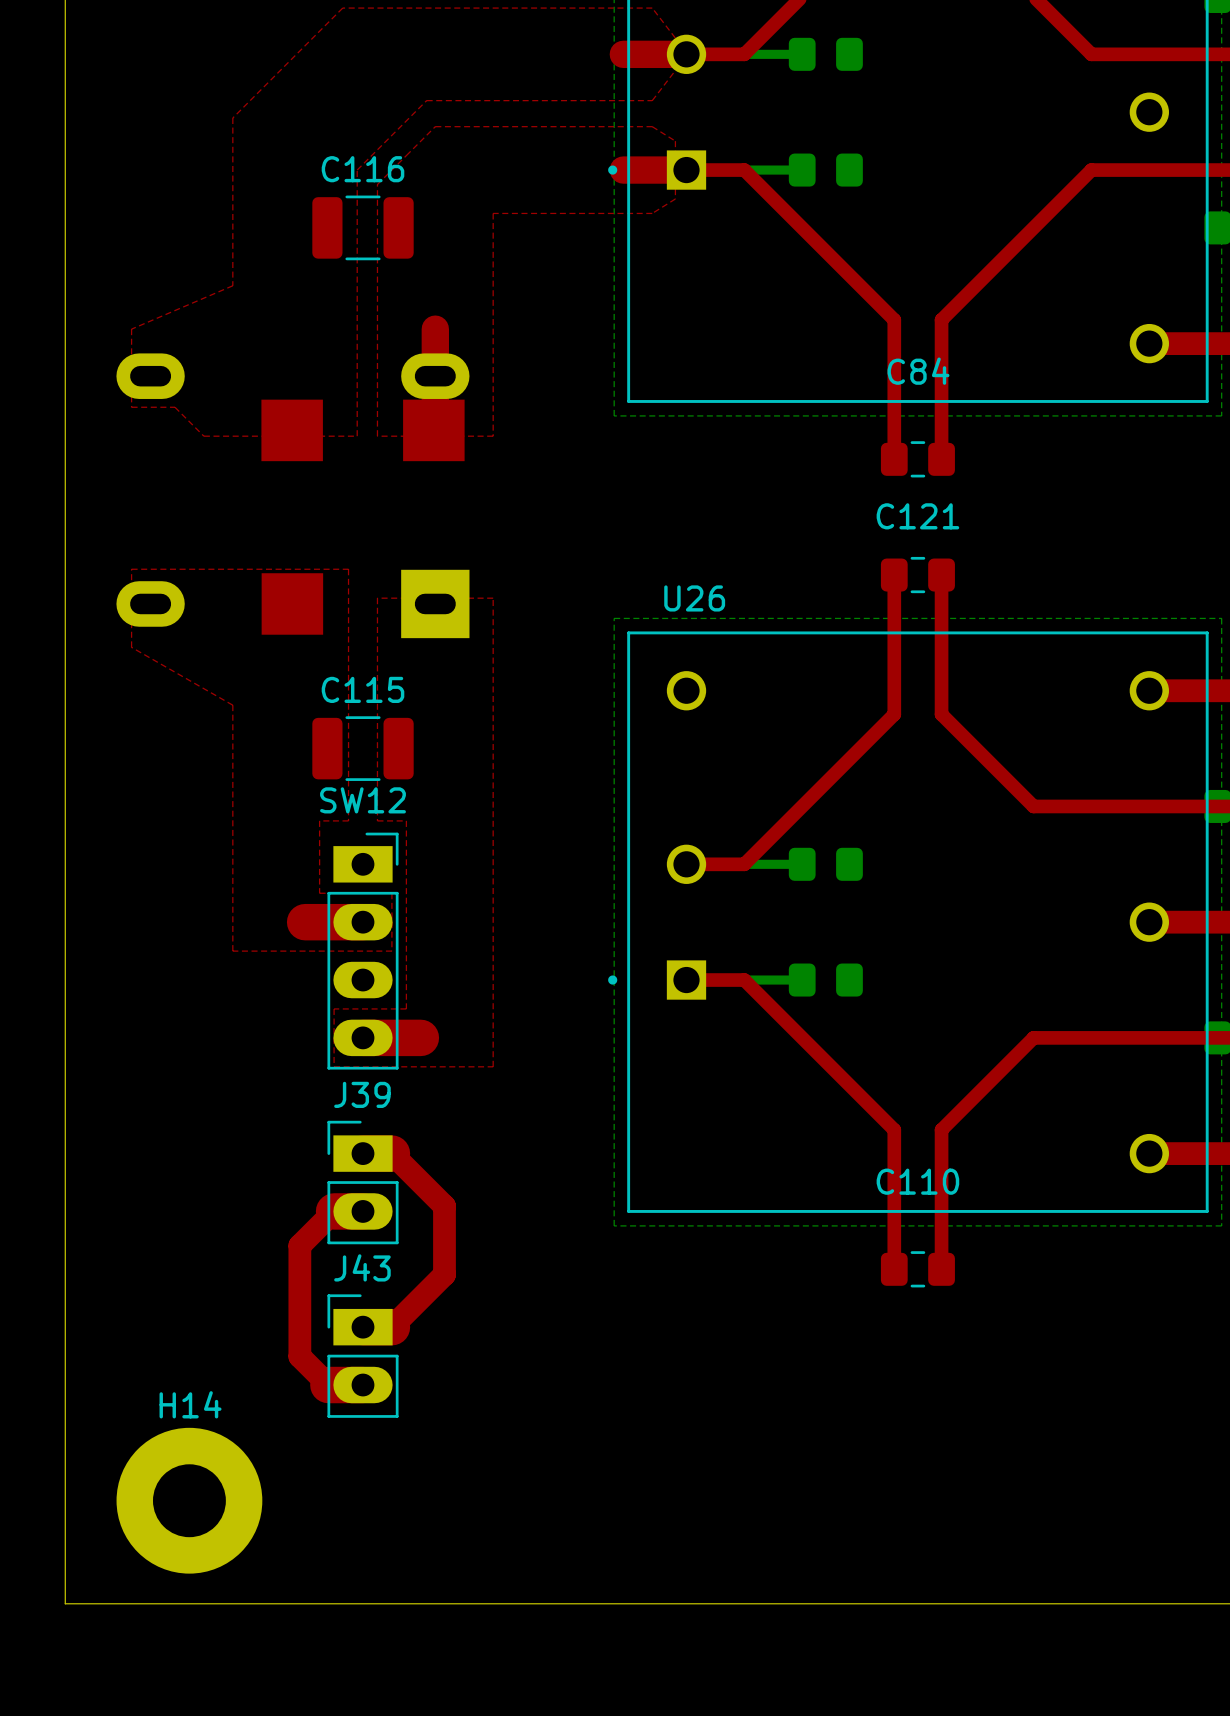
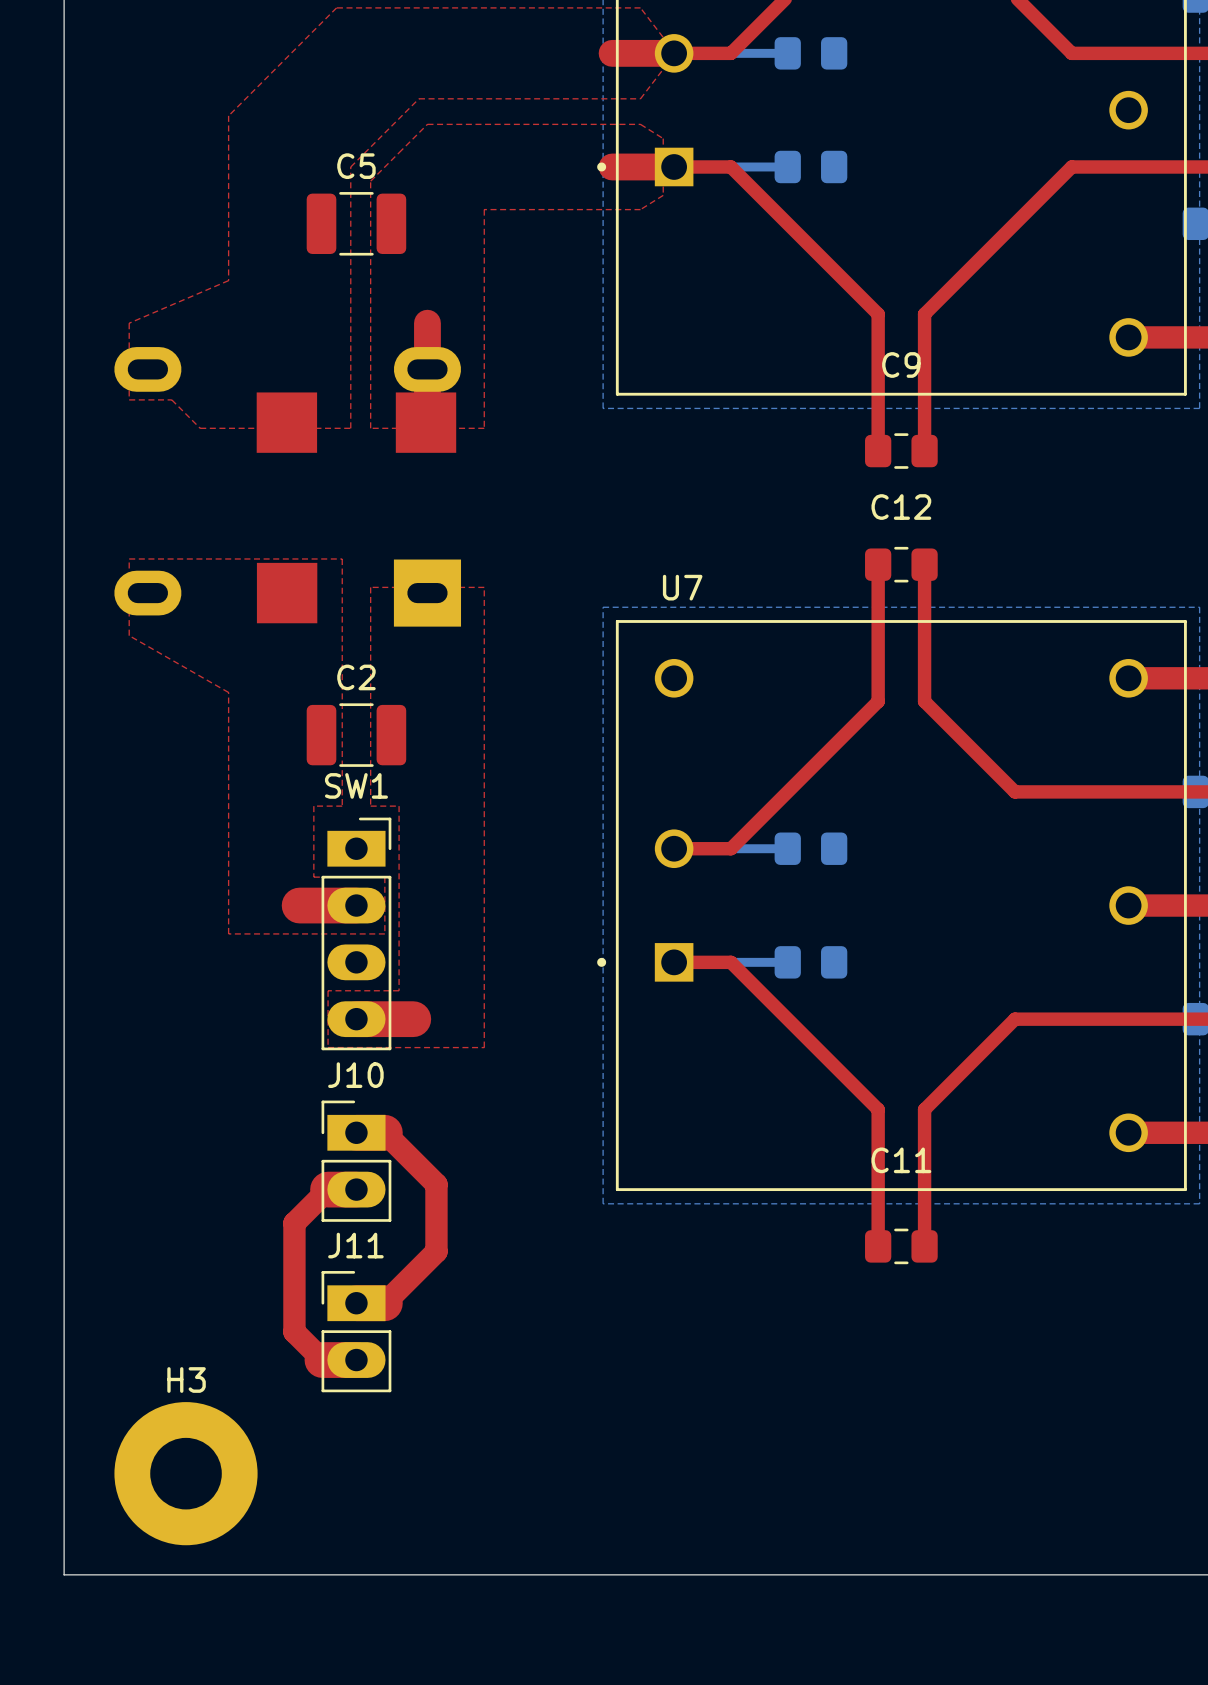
C116 name: C116 (363, 169) -> C5 (356, 166)
C84 name: C84 (918, 371) -> C9 (901, 364)
C121 name: C121 (917, 516) -> C12 (901, 507)
U26 name: U26 (694, 598) -> U7 (682, 587)
C115 name: C115 (363, 689) -> C2 (356, 677)
SW12 name: SW12 (363, 800) -> SW1 (356, 785)
J39 name: J39 (362, 1094) -> J10 (355, 1075)
C110 name: C110 (917, 1181) -> C11 (901, 1160)
J43 name: J43 (362, 1267) -> J11 (355, 1245)
H14 name: H14 (190, 1404) -> H3 (186, 1380)

